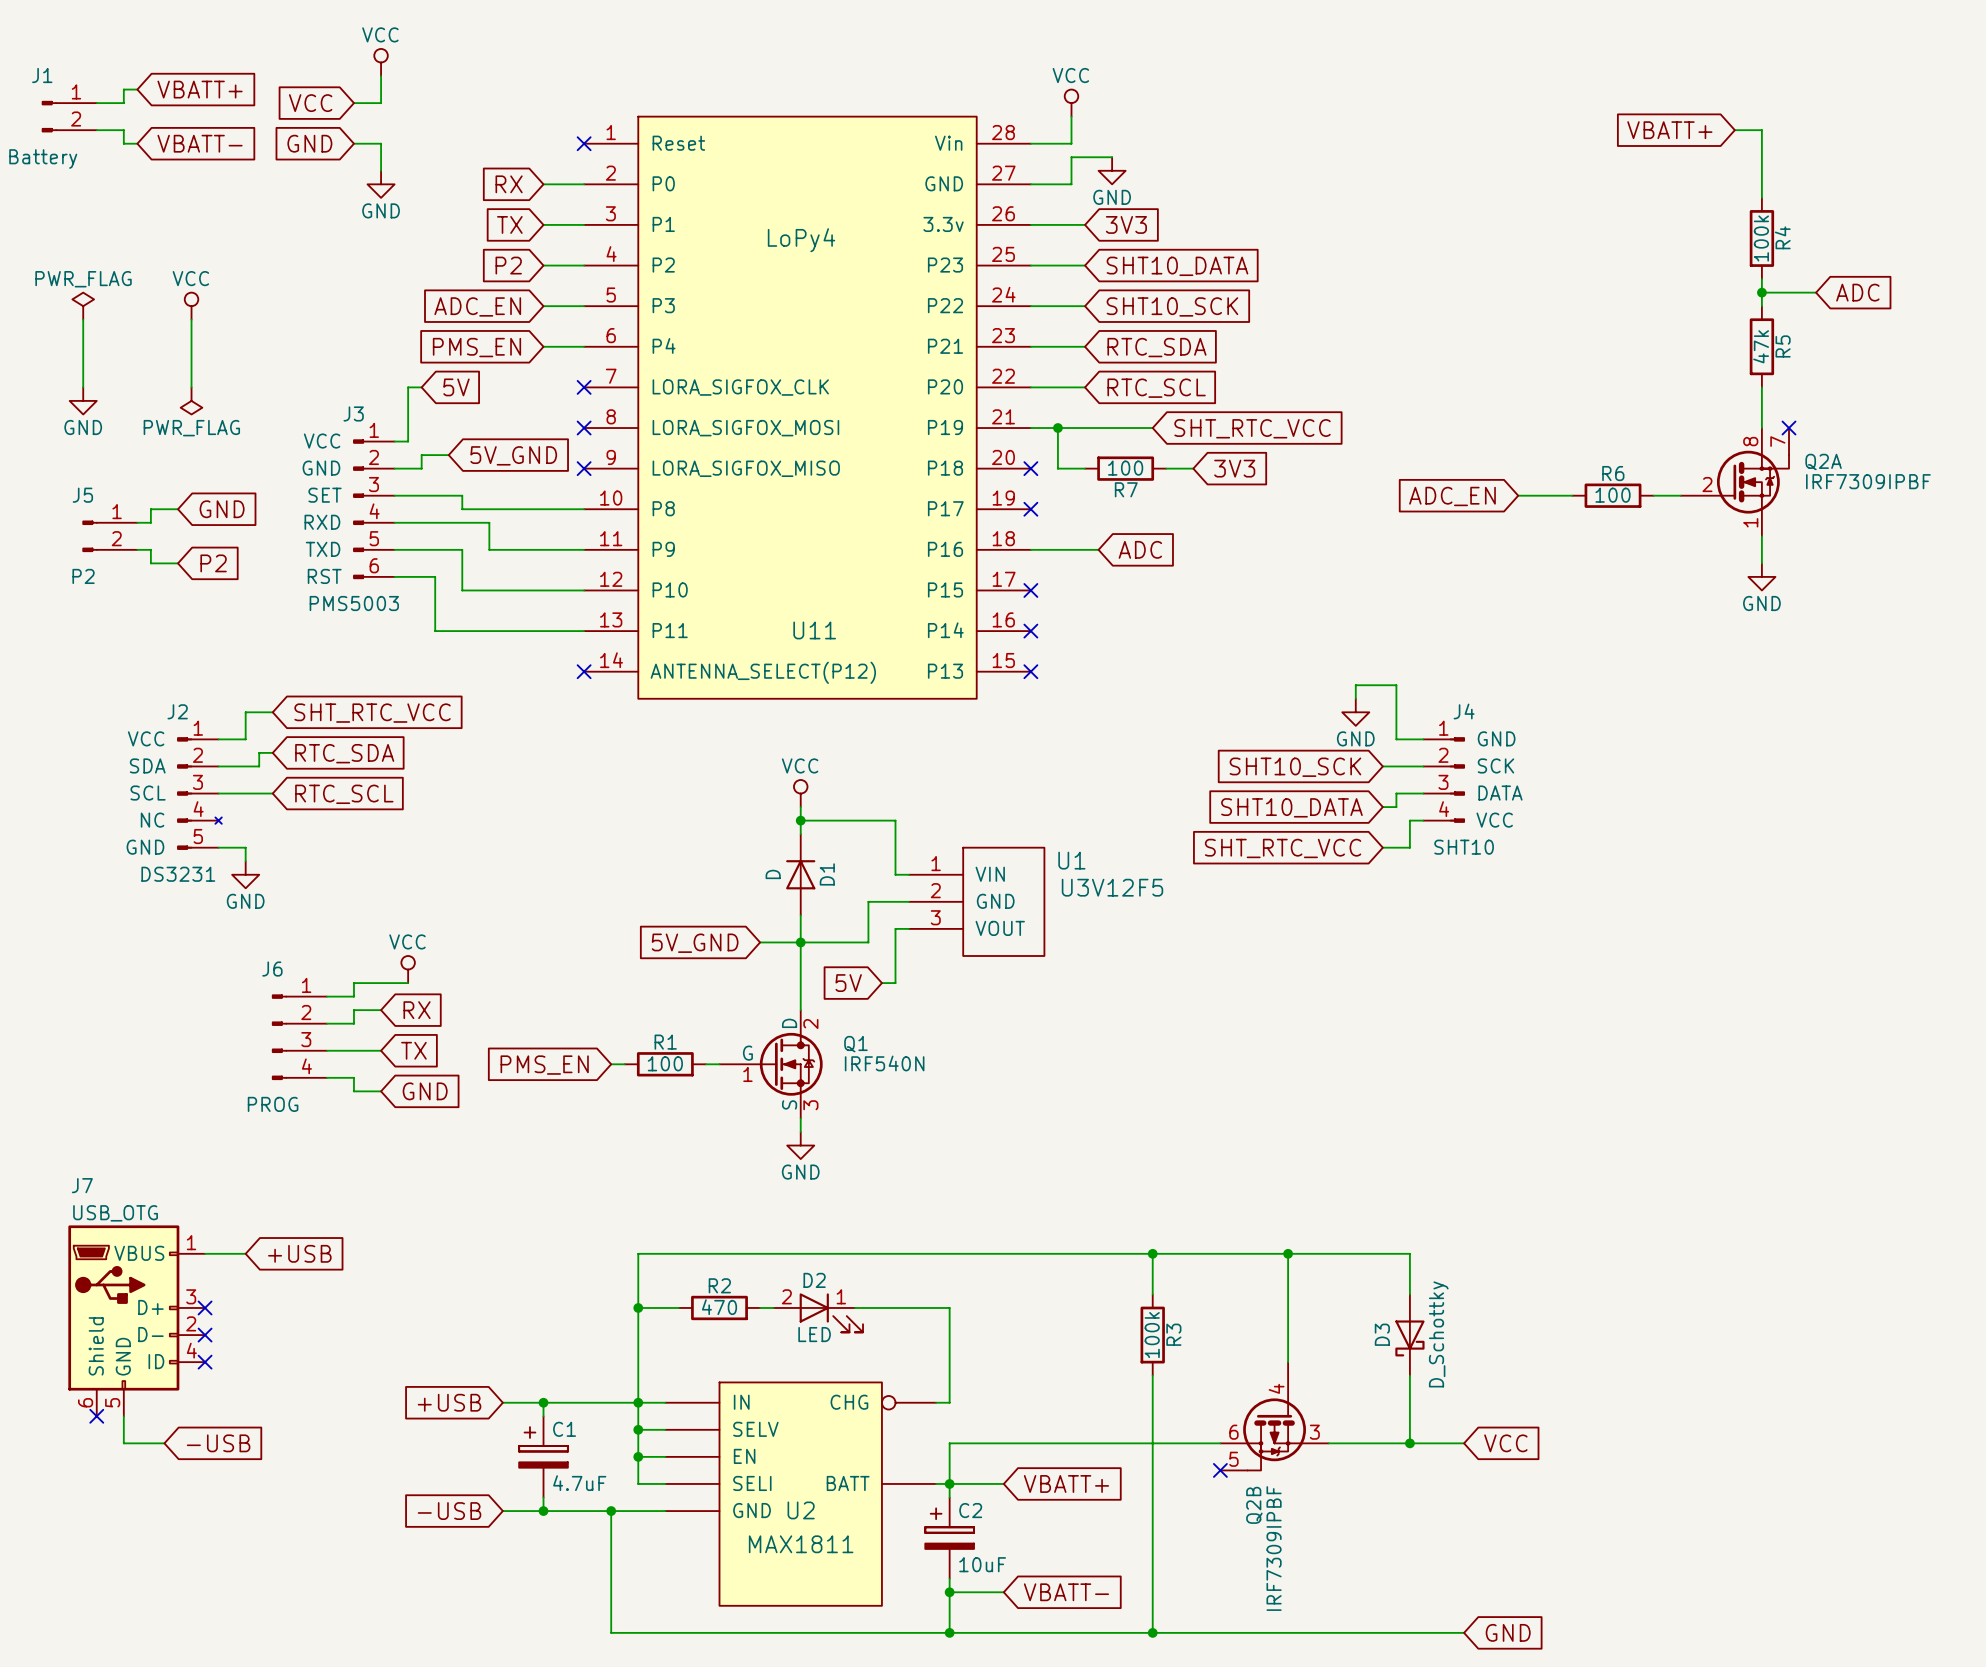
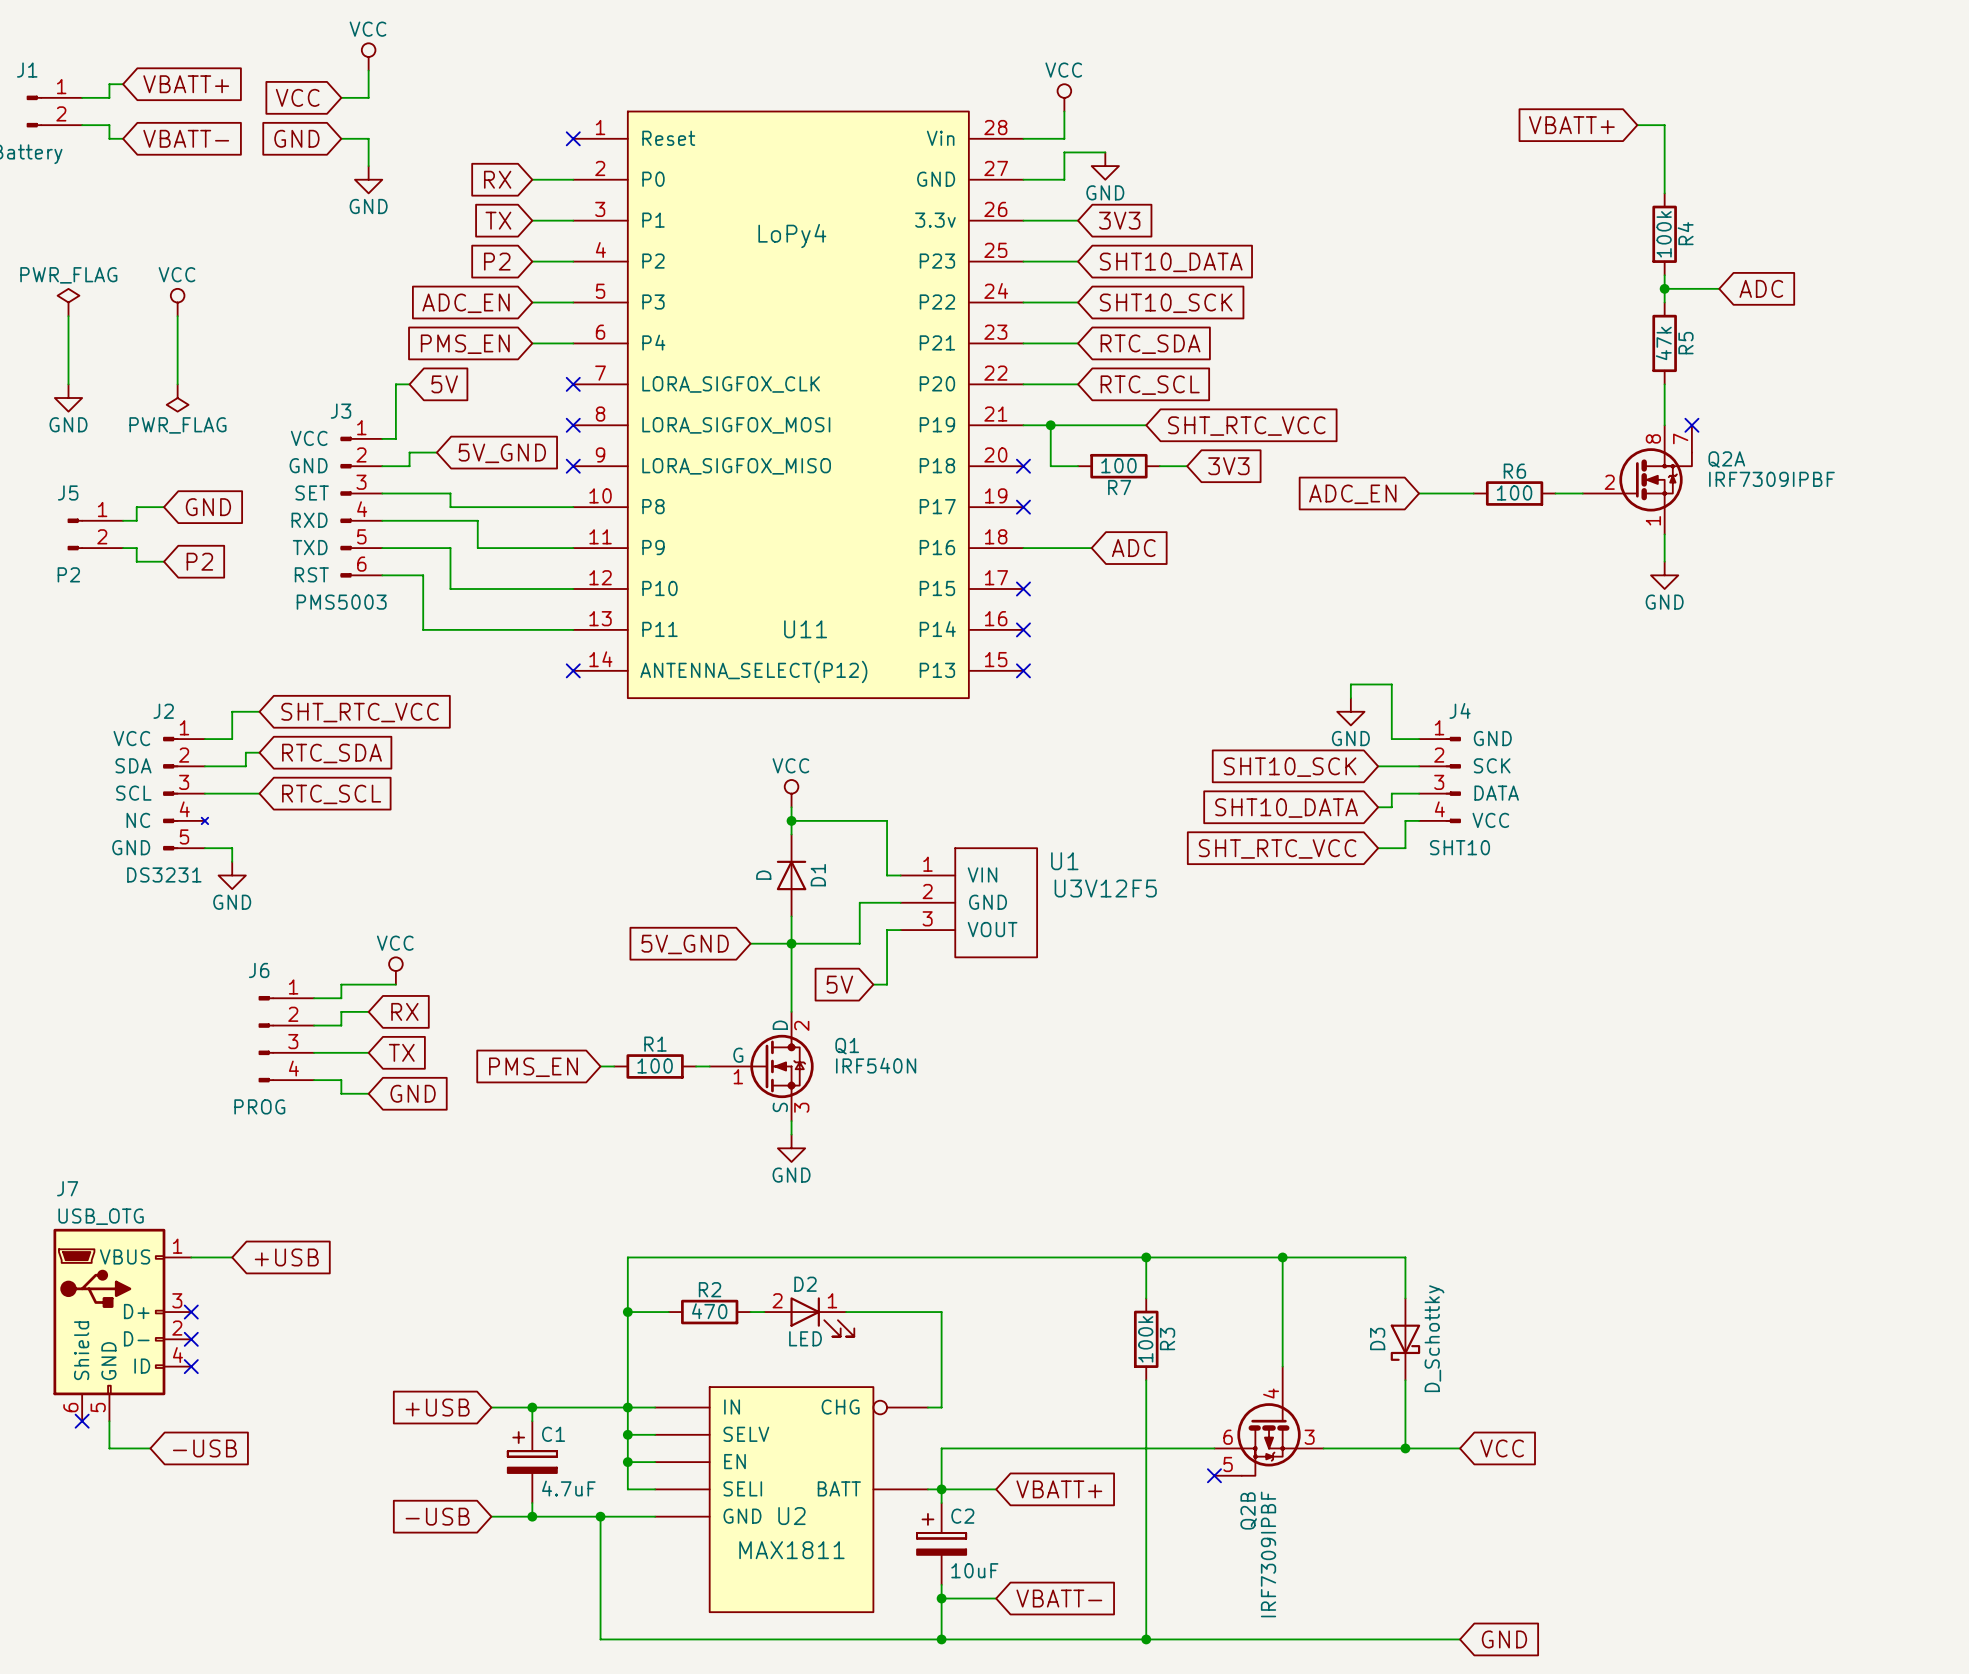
global label position: VBATT+ (1669, 130) -> VBATT+ (1571, 125)
wire: (1734, 130) (1761, 130) (1761, 197) -> (1637, 125) (1664, 125) (1664, 193)
R4 position: (1761, 238) -> (1664, 234)
wire: (1761, 279) (1761, 306) -> (1664, 275) (1664, 302)
junction: none -> (1664, 288)
wire: (1761, 292) (1816, 292) -> (1664, 288) (1719, 288)
junction: (1761, 292) -> none
global label position: ADC (1857, 292) -> ADC (1761, 288)
R5 position: (1761, 346) -> (1664, 343)
wire: (1761, 387) (1761, 428) -> (1664, 384) (1664, 425)
no-connect mark: none -> (1691, 425)
no-connect mark: (1789, 428) -> none
Q2A position: (1734, 482) -> (1637, 479)
wire: none -> (1419, 493) (1473, 493)
wire: (1518, 495) (1558, 495) -> none
R6 position: (1613, 495) -> (1514, 493)
global label position: ADC_EN (1452, 496) -> ADC_EN (1352, 494)
wire: (1761, 536) (1761, 563) -> (1664, 534) (1664, 561)
power symbol position: GND (1761, 576) -> GND (1664, 575)

